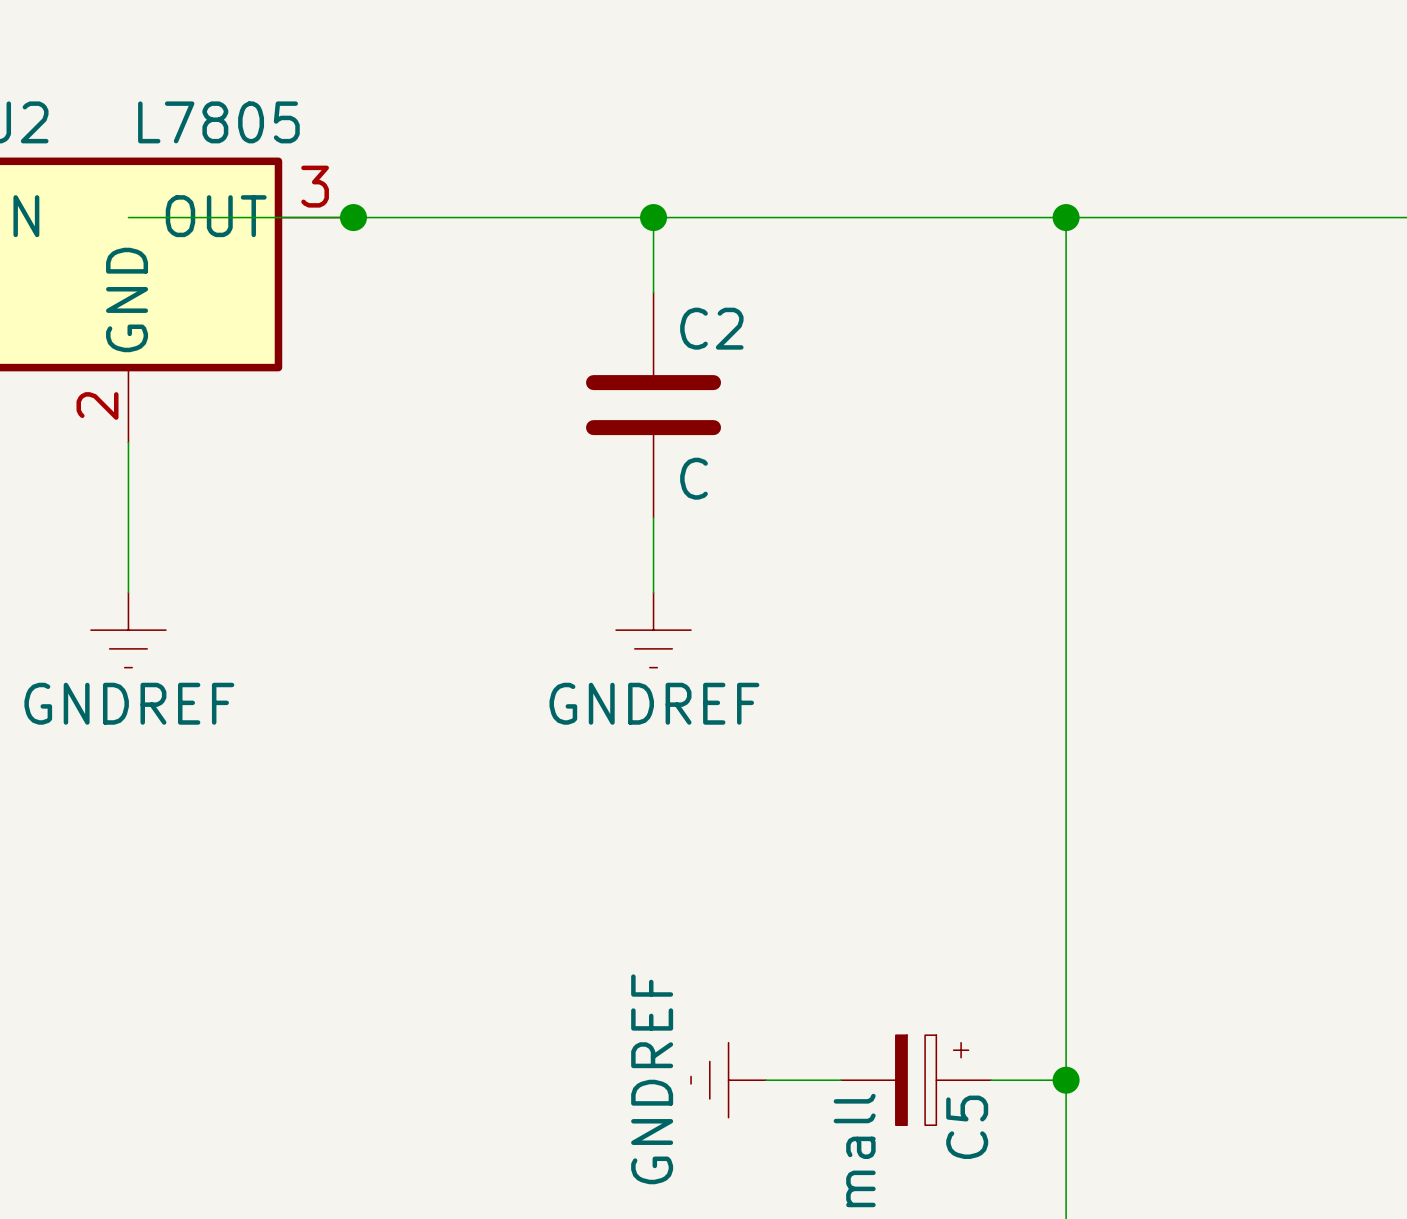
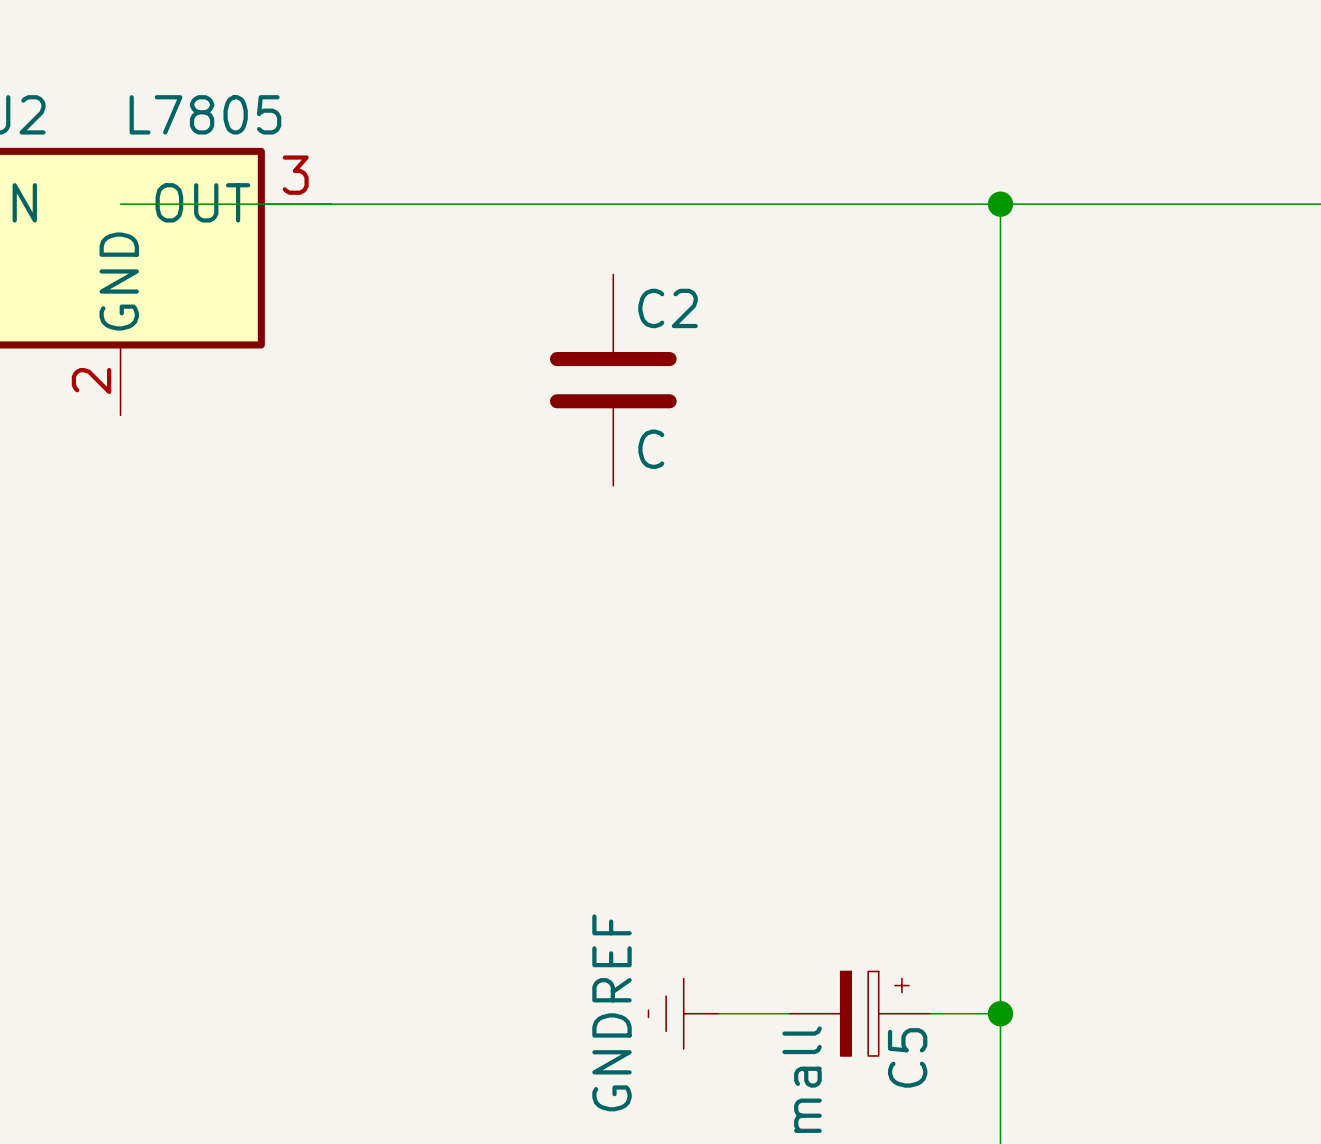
junction: (353, 217) -> none
wire: (653, 217) (653, 292) -> none
junction: (653, 217) -> none
wire: (128, 442) (128, 592) -> none
wire: (653, 517) (653, 592) -> none
power symbol: GNDREF (128, 630) -> none
power symbol: GNDREF (653, 630) -> none

